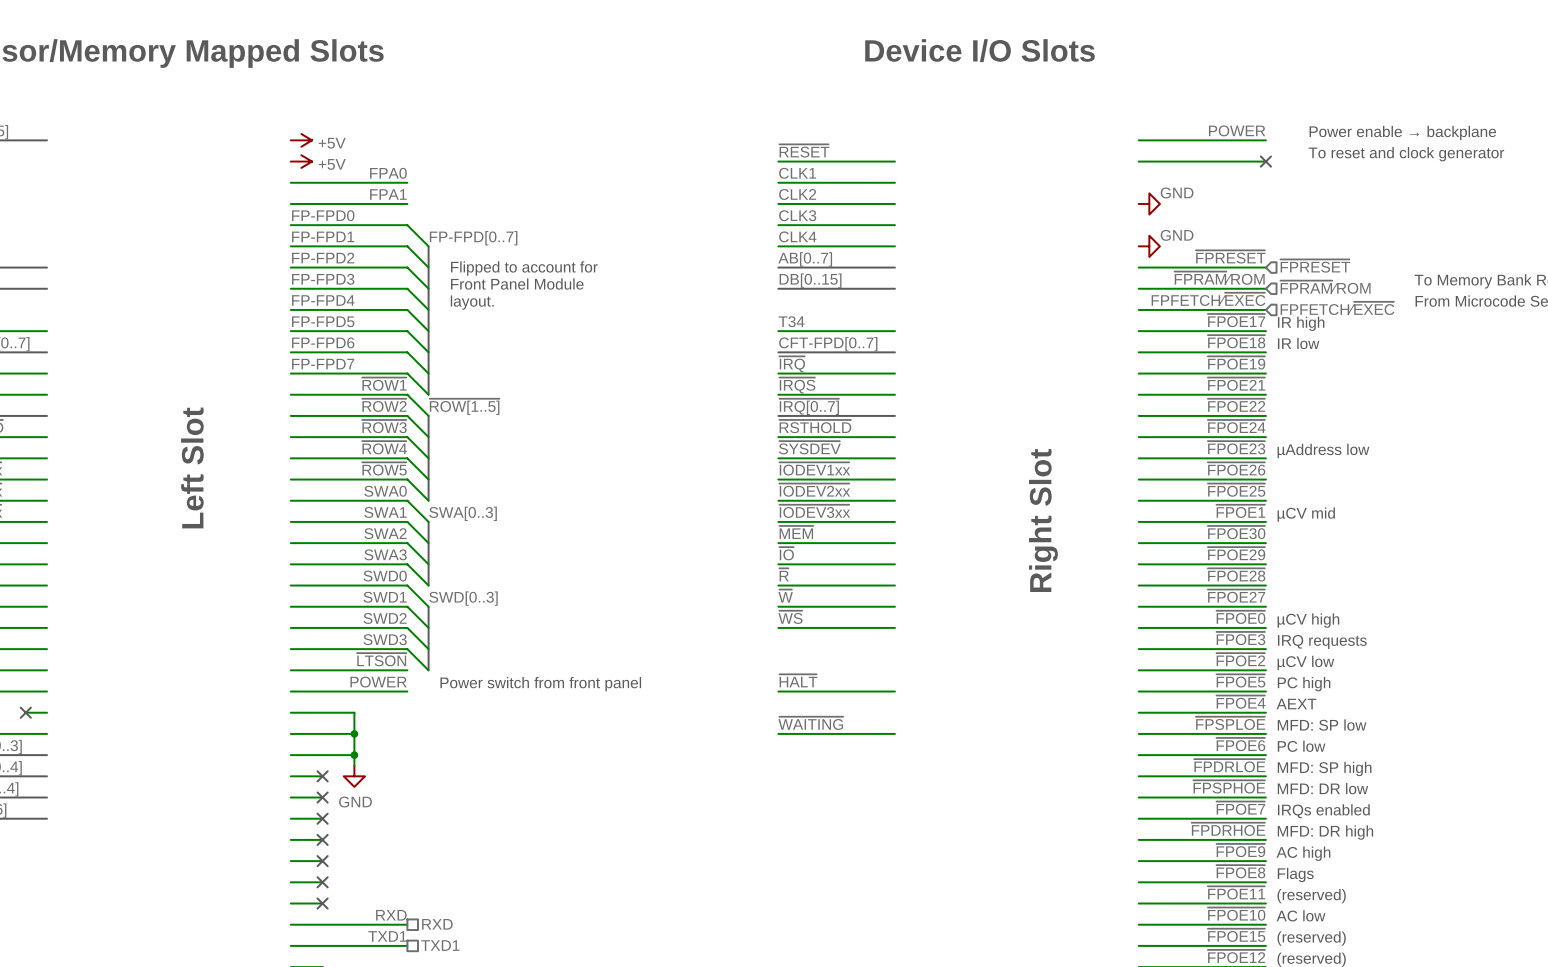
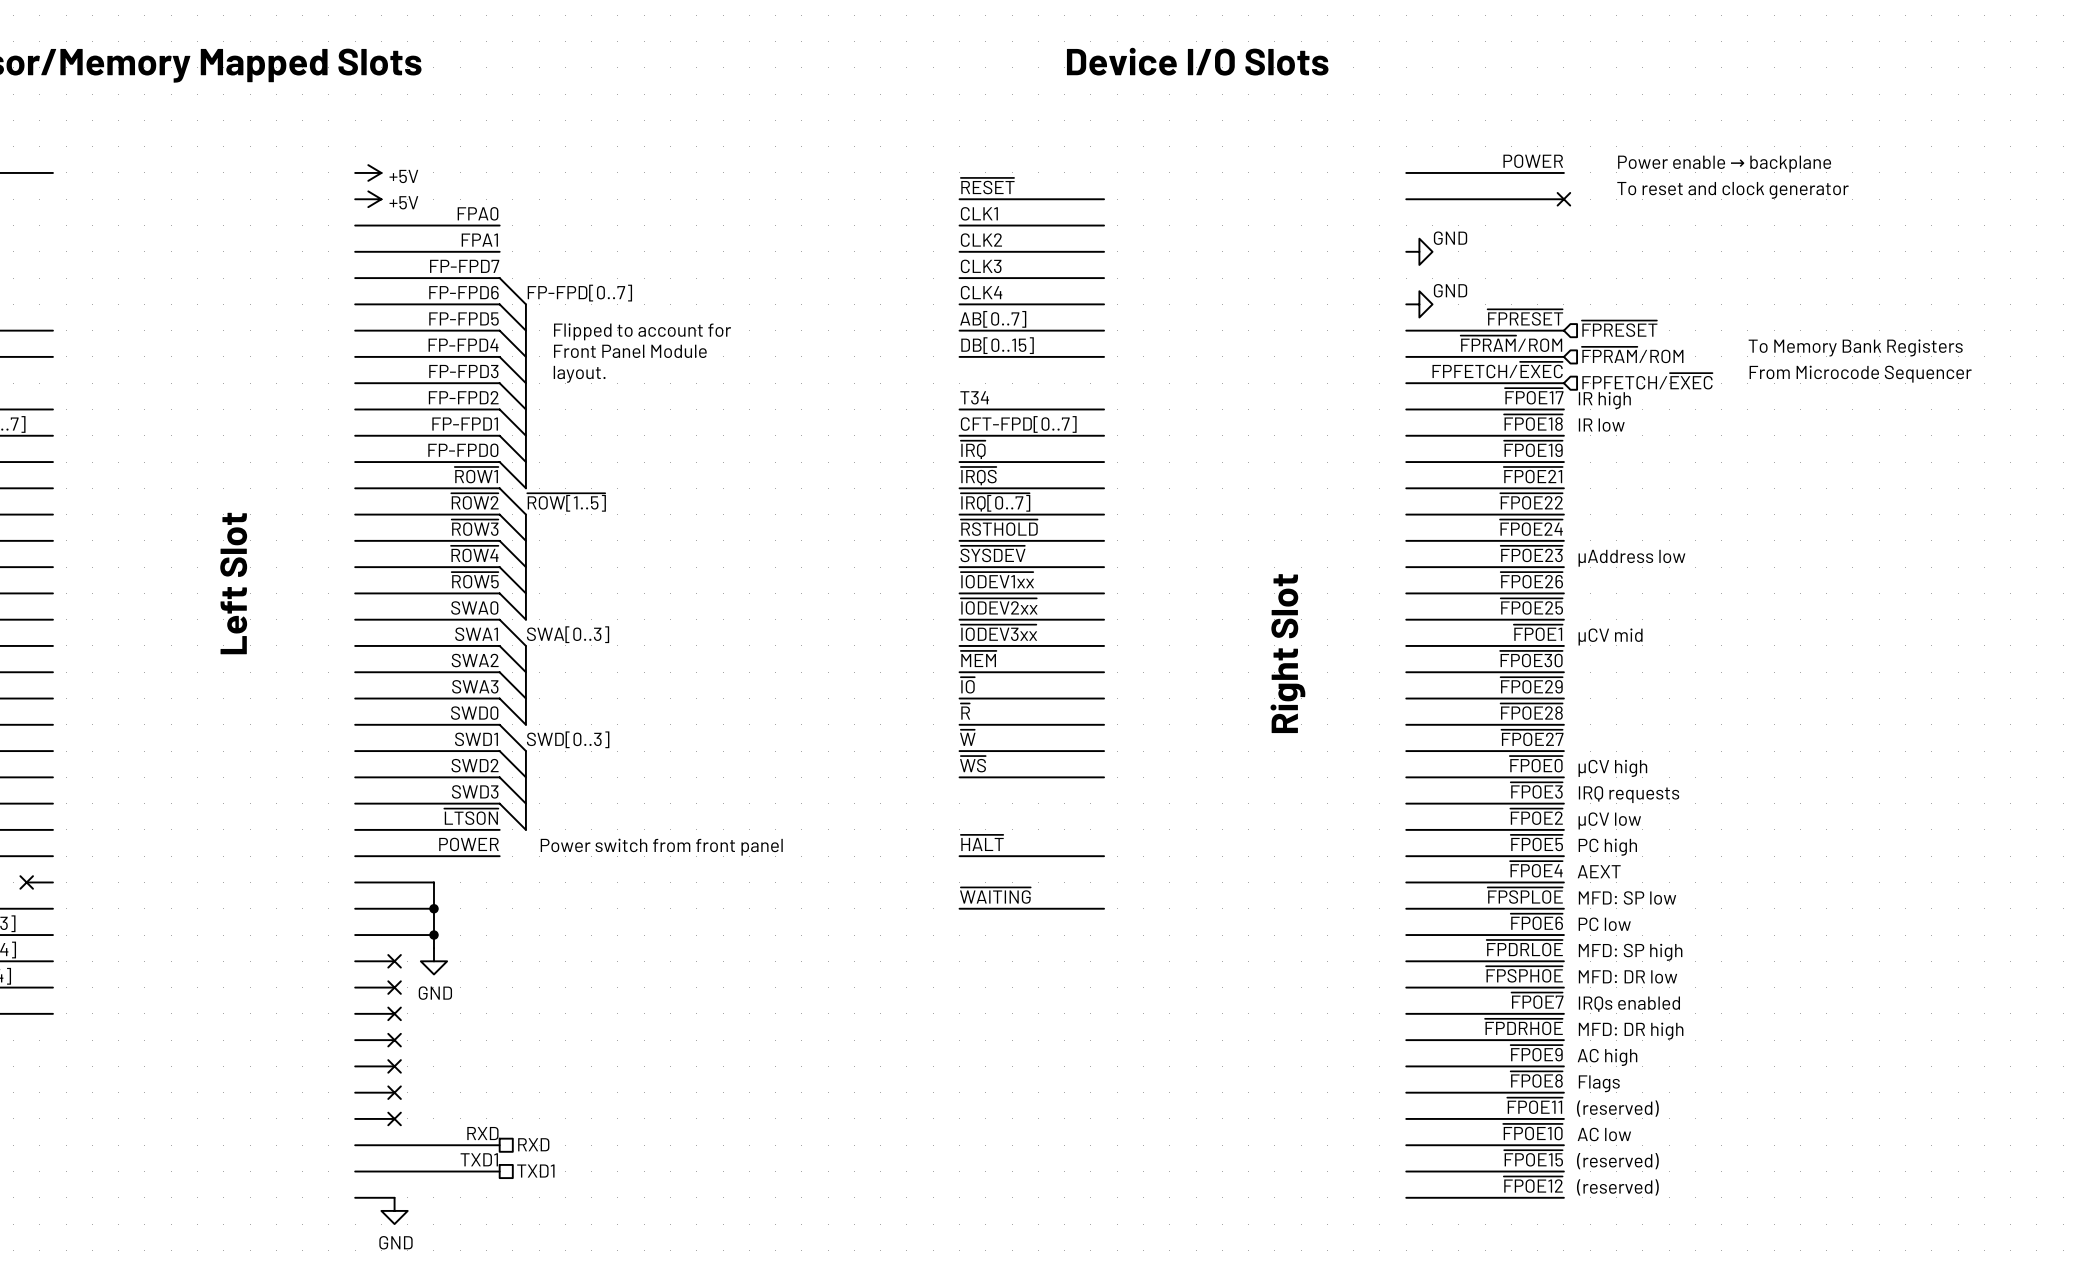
label position: FP-FPD0 (323, 215) -> FP-FPD0 (463, 450)
label position: FP-FPD1 (323, 236) -> FP-FPD1 (465, 424)
label position: FP-FPD2 (323, 258) -> FP-FPD2 (463, 397)
label position: FP-FPD3 (323, 279) -> FP-FPD3 (463, 371)
label position: FP-FPD4 (323, 300) -> FP-FPD4 (463, 345)
label position: FP-FPD5 (323, 321) -> FP-FPD5 (464, 318)
label position: FP-FPD6 (323, 342) -> FP-FPD6 (463, 292)
label position: FP-FPD7 (323, 364) -> FP-FPD7 (464, 266)

